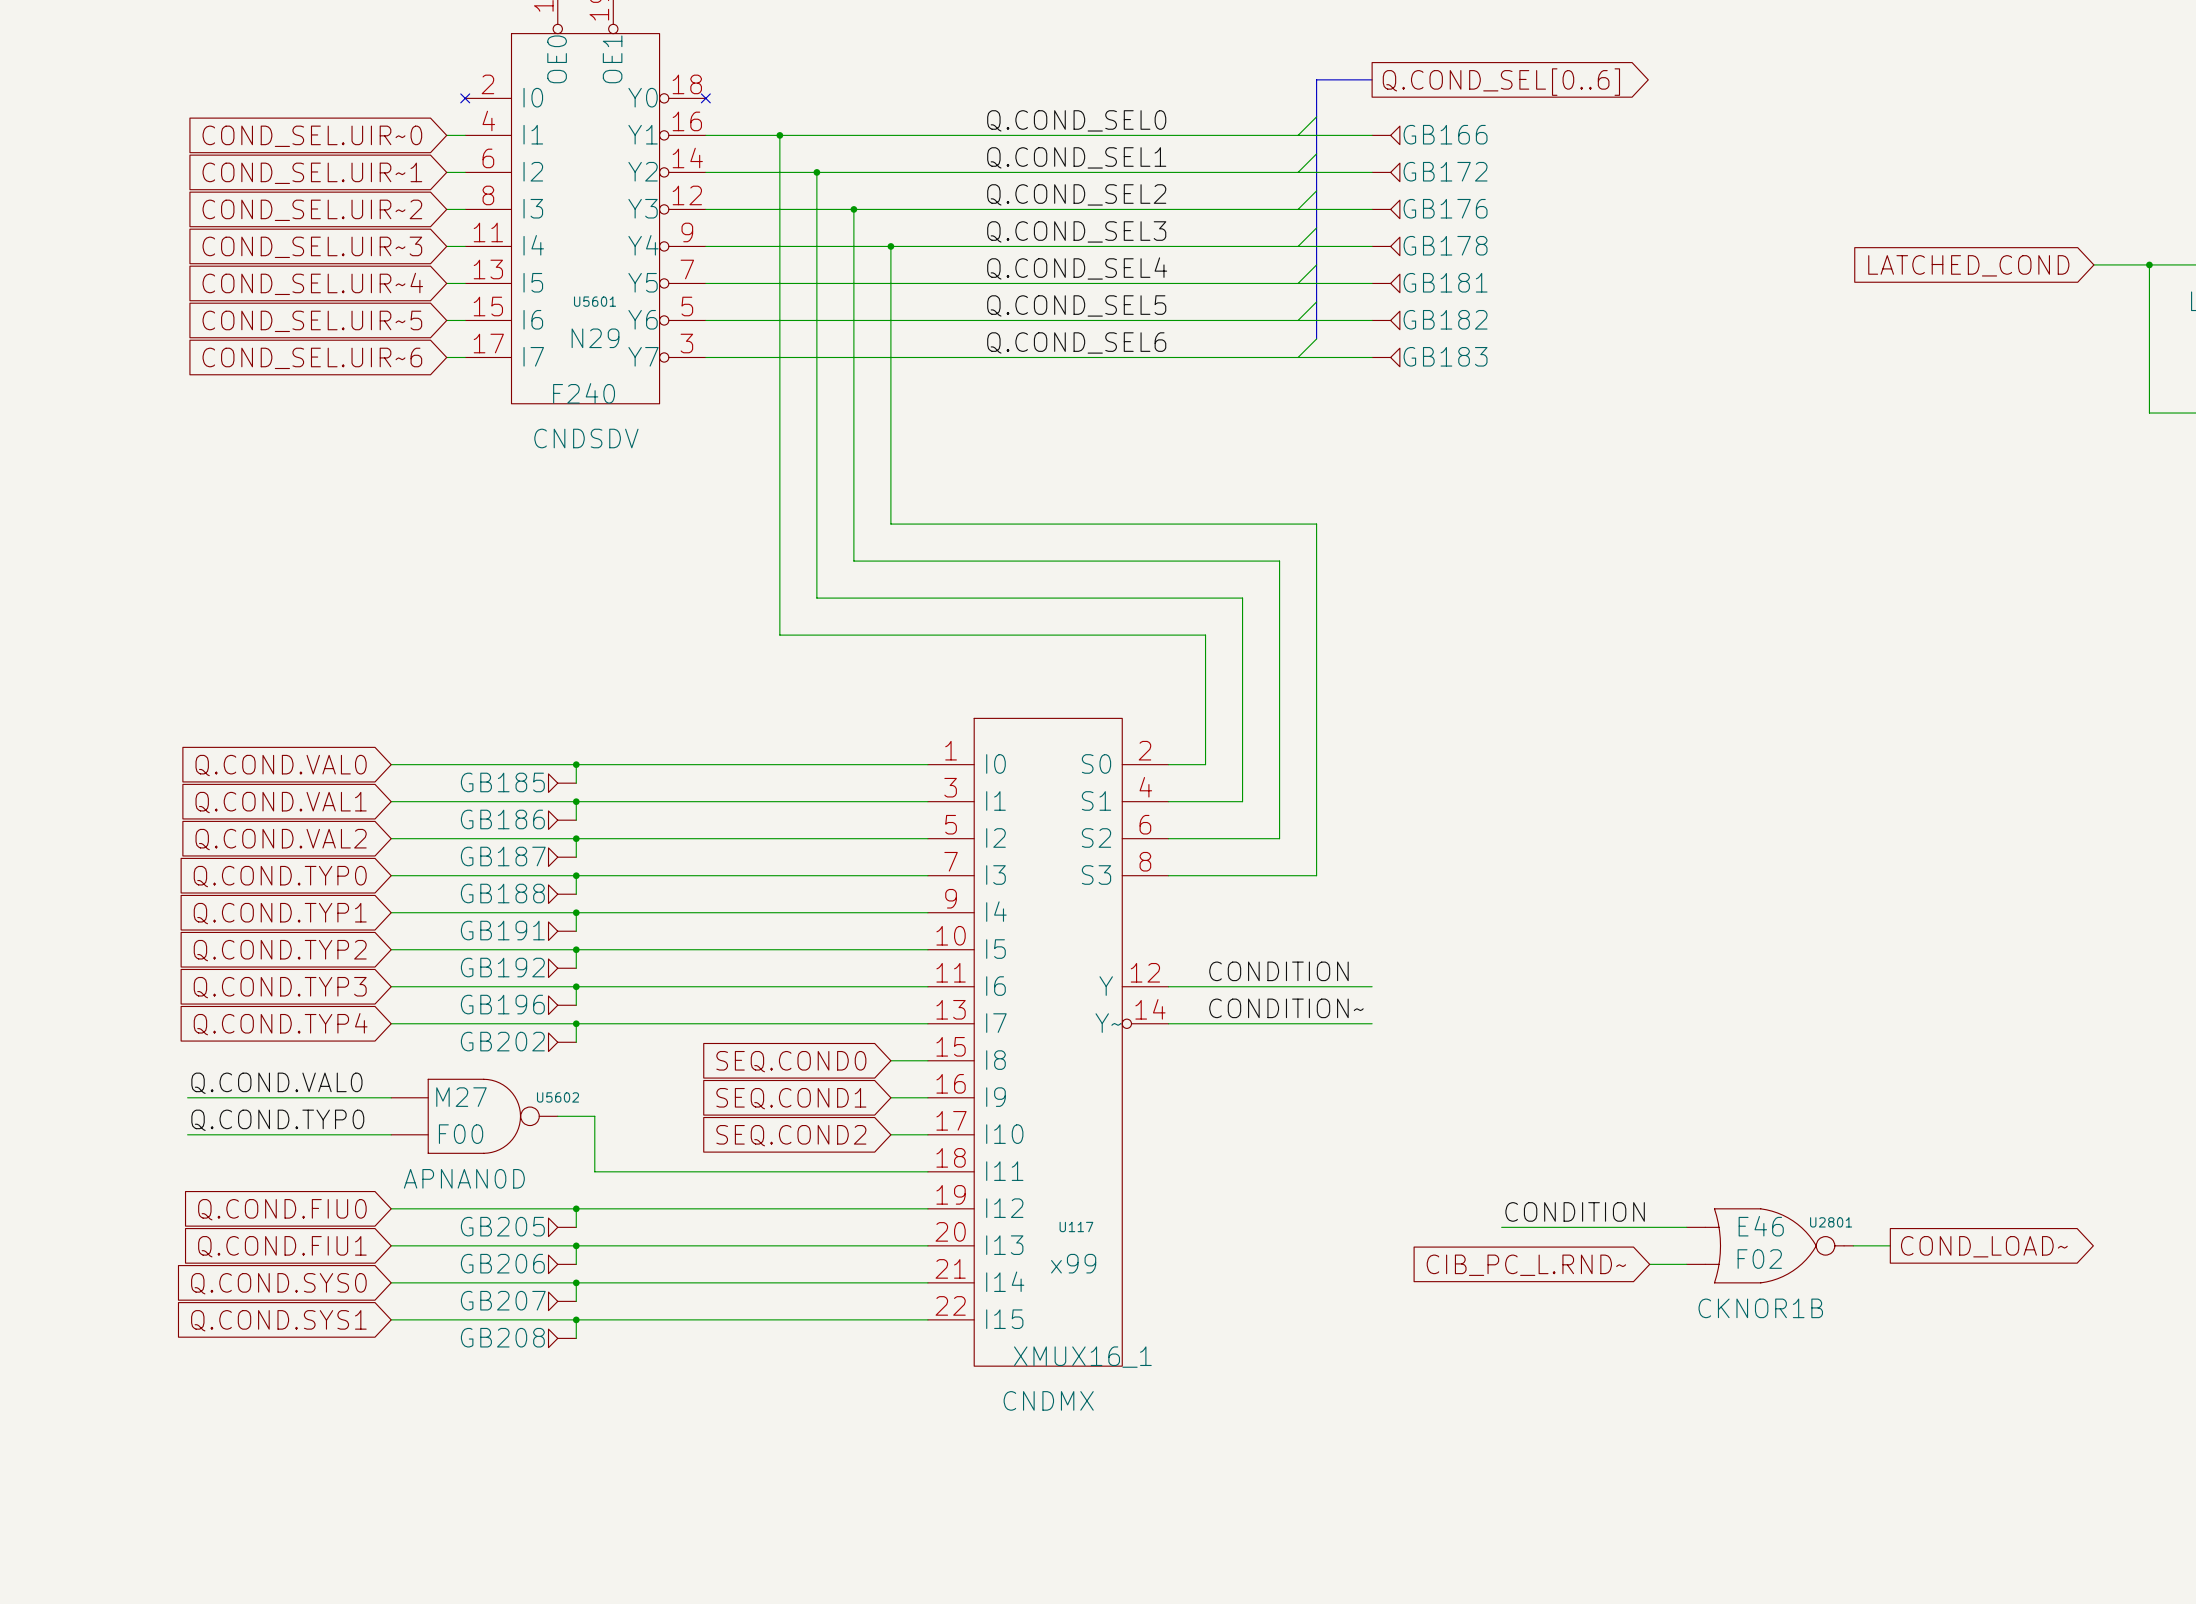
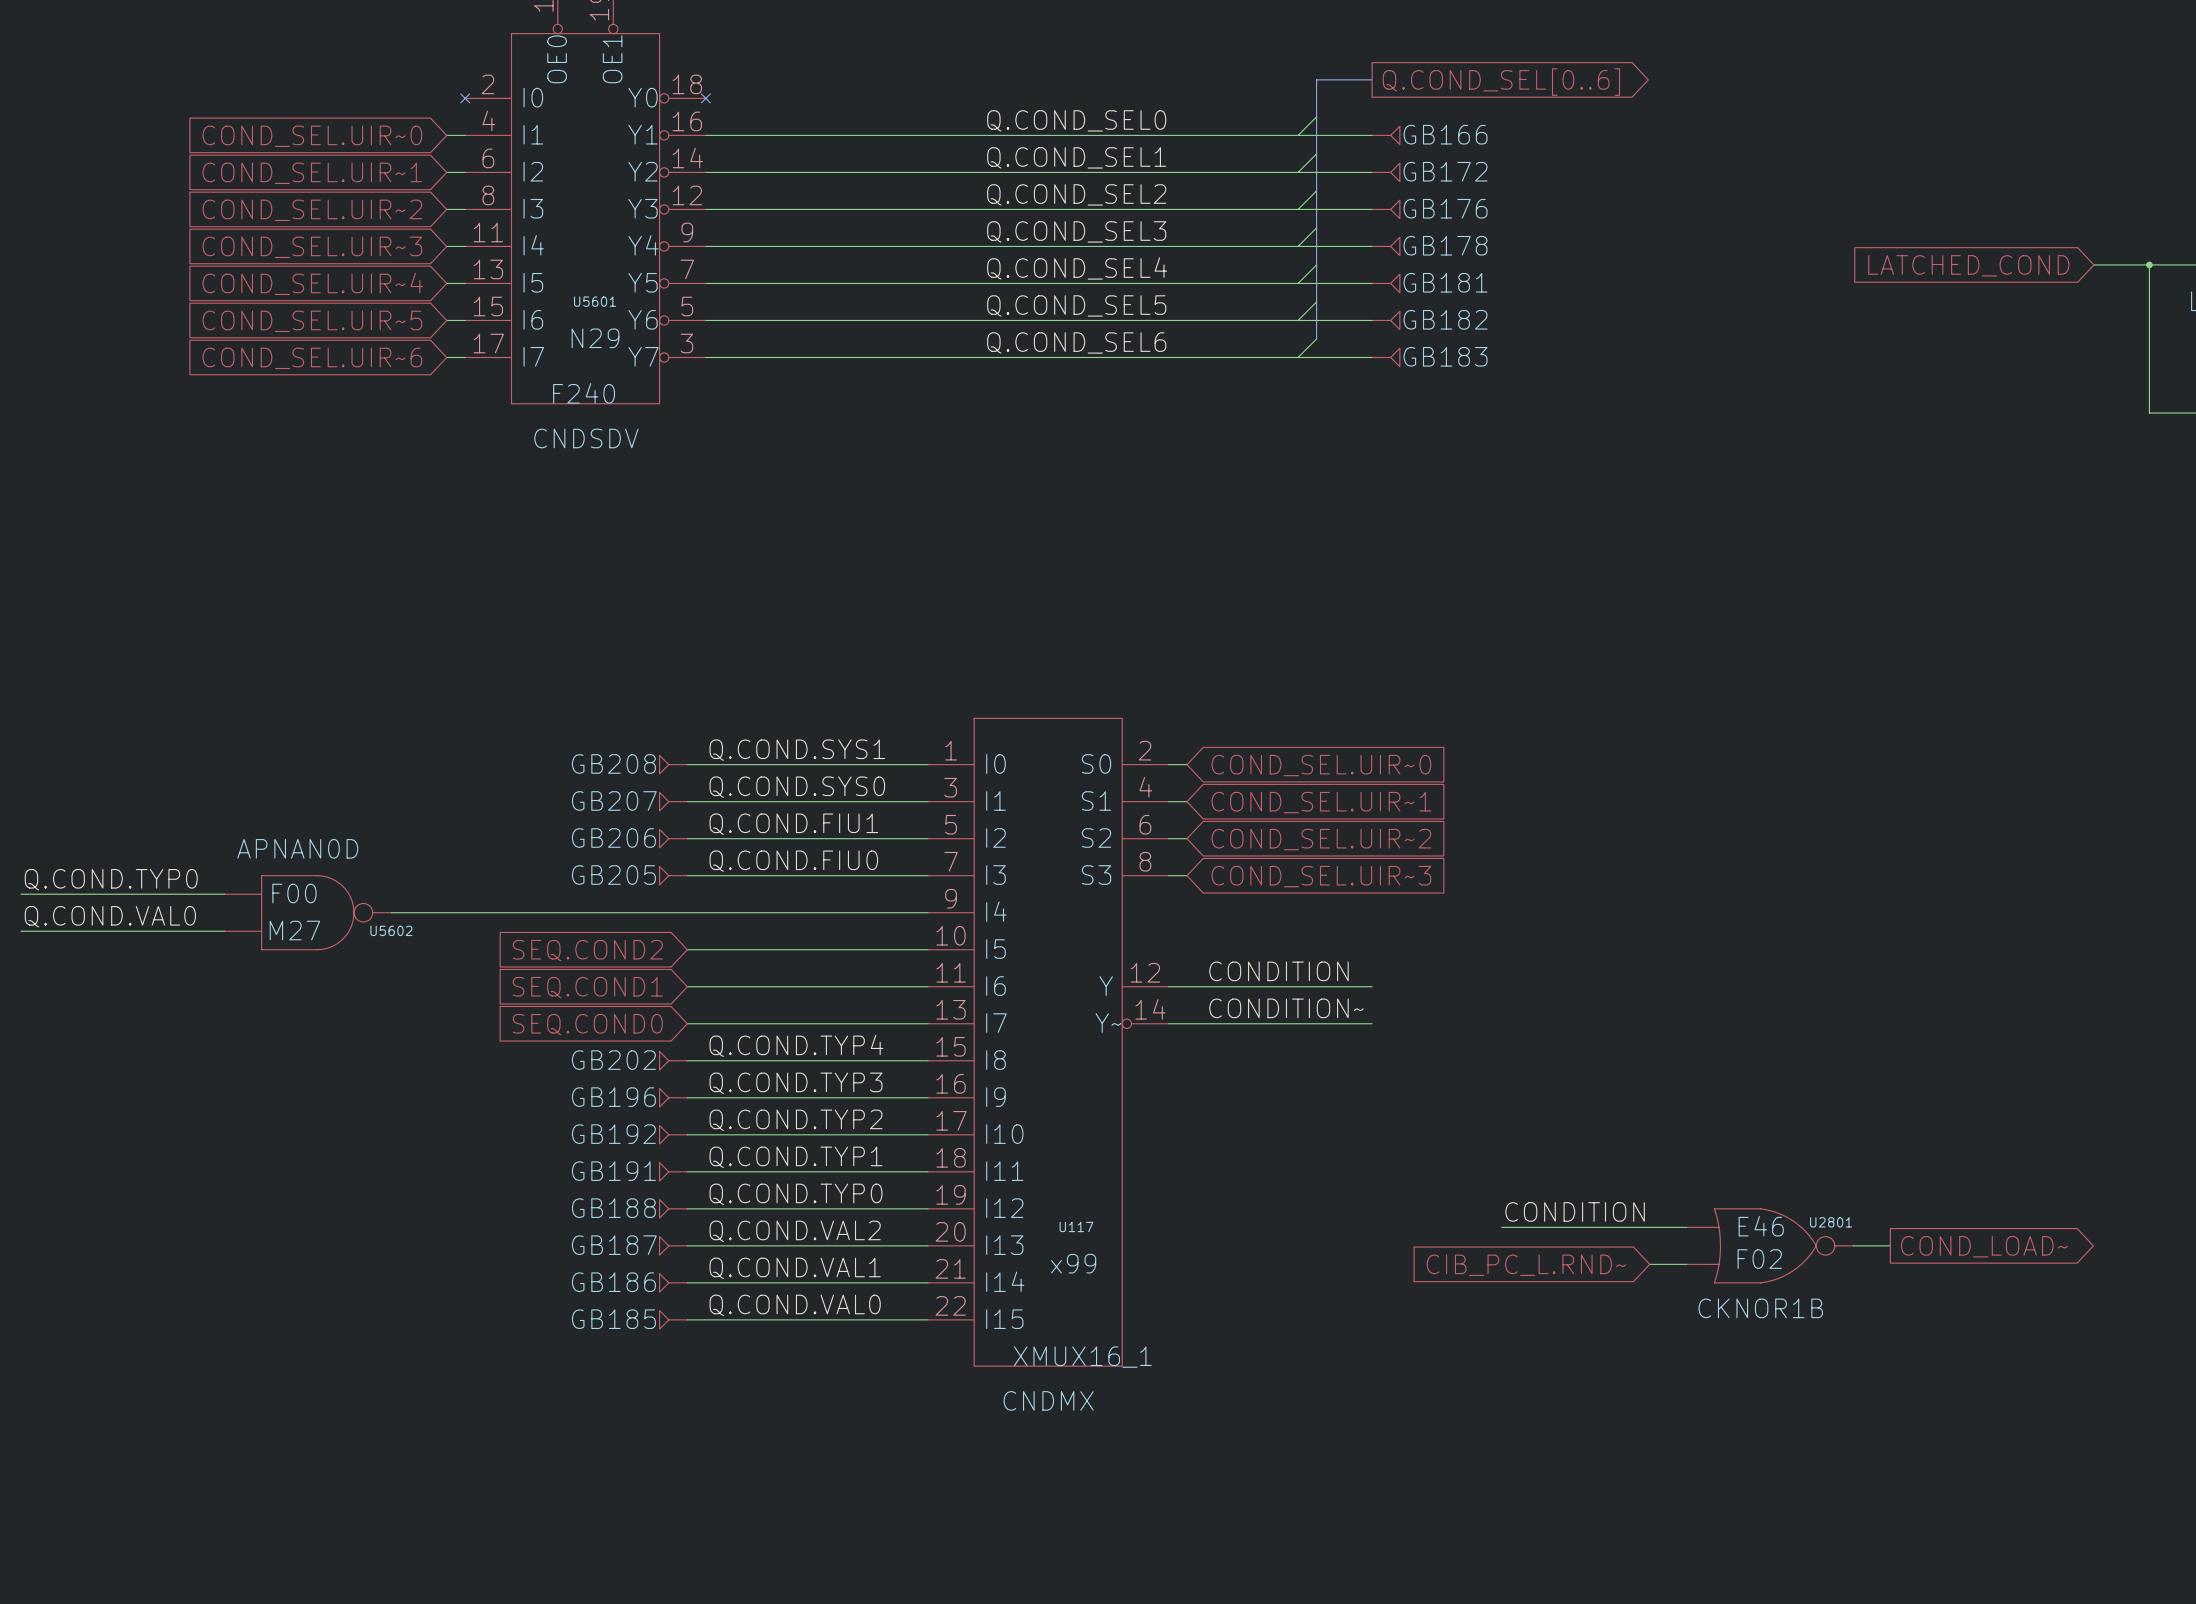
wire: (779, 135) (779, 635) (1205, 635) (1205, 764) (1187, 764) -> none
junction: (779, 135) -> none
wire: (816, 172) (816, 598) (1242, 598) (1242, 801) (1187, 801) -> none
junction: (816, 172) -> none
wire: (853, 209) (853, 561) (1279, 561) (1279, 838) (1187, 838) -> none
junction: (853, 209) -> none
wire: (890, 246) (890, 524) (1316, 524) (1316, 875) (1187, 875) -> none
junction: (890, 246) -> none
label: none -> Q.COND.SYS1 (797, 750)
wire: (391, 764) (687, 764) -> none
wire: (576, 764) (576, 783) -> none
junction: (576, 764) -> none
global label: Q.COND.VAL0 (281, 765) -> none
global label: none -> COND_SEL.UIR~0 (1321, 765)
GB185 position: (562, 783) -> (673, 1319)
label: none -> Q.COND.SYS0 (797, 787)
wire: (391, 801) (687, 801) -> none
wire: (576, 801) (576, 820) -> none
junction: (576, 801) -> none
global label: Q.COND.VAL1 (281, 802) -> none
global label: none -> COND_SEL.UIR~1 (1321, 802)
GB186 position: (562, 820) -> (673, 1282)
label: none -> Q.COND.FIU1 (793, 824)
wire: (391, 838) (687, 838) -> none
wire: (576, 838) (576, 857) -> none
junction: (576, 838) -> none
global label: Q.COND.VAL2 (281, 839) -> none
global label: none -> COND_SEL.UIR~2 (1321, 839)
GB187 position: (562, 857) -> (673, 1245)
label: none -> Q.COND.FIU0 (793, 861)
wire: (391, 875) (687, 875) -> none
wire: (576, 875) (576, 894) -> none
junction: (576, 875) -> none
global label: Q.COND.TYP0 (280, 876) -> none
global label: none -> COND_SEL.UIR~3 (1321, 876)
label: none -> Q.COND.TYP0 (111, 879)
wire: none -> (21, 894) (224, 894)
GB188 position: (562, 894) -> (673, 1208)
wire: (576, 912) (576, 931) -> none
junction: (576, 912) -> none
global label: Q.COND.TYP1 (280, 913) -> none
label: none -> Q.COND.VAL0 (110, 916)
wire: none -> (21, 931) (224, 931)
GB191 position: (562, 931) -> (673, 1171)
wire: (391, 949) (687, 949) -> none
wire: (576, 949) (576, 968) -> none
junction: (576, 949) -> none
global label: Q.COND.TYP2 (280, 950) -> none
global label: none -> SEQ.COND2 (587, 950)
GB192 position: (562, 968) -> (673, 1134)
wire: (391, 986) (687, 986) -> none
wire: (576, 986) (576, 1005) -> none
junction: (576, 986) -> none
global label: Q.COND.TYP3 (280, 987) -> none
global label: none -> SEQ.COND1 (587, 987)
GB196 position: (562, 1005) -> (673, 1097)
wire: (391, 1023) (687, 1023) -> none
wire: (576, 1023) (576, 1042) -> none
junction: (576, 1023) -> none
global label: Q.COND.TYP4 (280, 1024) -> none
global label: none -> SEQ.COND0 (587, 1024)
GB202 position: (562, 1042) -> (673, 1060)
label: none -> Q.COND.TYP4 (796, 1045)
wire: none -> (687, 1060) (890, 1060)
global label: SEQ.COND0 (791, 1061) -> none
label: Q.COND.VAL0 (276, 1083) -> none
label: none -> Q.COND.TYP3 (796, 1083)
wire: (187, 1097) (391, 1097) -> none
U5602 text position: M27 (461, 1097) -> M27 (294, 930)
U5602 name position: U5602 (557, 1097) -> U5602 (391, 930)
wire: none -> (687, 1097) (890, 1097)
global label: SEQ.COND1 (791, 1098) -> none
U5602 position: (474, 1116) -> (307, 912)
wire: (557, 1116) (594, 1116) (594, 1171) (687, 1171) -> none
label: Q.COND.TYP0 (277, 1120) -> none
label: none -> Q.COND.TYP2 (796, 1120)
wire: (187, 1134) (391, 1134) -> none
U5602 value position: F00 (461, 1134) -> F00 (294, 893)
wire: none -> (687, 1134) (890, 1134)
global label: SEQ.COND2 (791, 1135) -> none
label: none -> Q.COND.TYP1 (796, 1157)
U5602 text position: APNAN0D (464, 1178) -> APNAN0D (297, 848)
label: none -> Q.COND.TYP0 (796, 1194)
wire: (391, 1208) (687, 1208) -> none
wire: (576, 1208) (576, 1227) -> none
junction: (576, 1208) -> none
global label: Q.COND.FIU0 (282, 1209) -> none
GB205 position: (562, 1227) -> (673, 875)
label: none -> Q.COND.VAL2 (795, 1231)
wire: (391, 1245) (687, 1245) -> none
wire: (576, 1245) (576, 1264) -> none
junction: (576, 1245) -> none
global label: Q.COND.FIU1 (282, 1246) -> none
GB206 position: (562, 1264) -> (673, 838)
label: none -> Q.COND.VAL1 (795, 1268)
wire: (391, 1282) (687, 1282) -> none
wire: (576, 1282) (576, 1301) -> none
junction: (576, 1282) -> none
global label: Q.COND.SYS0 (278, 1283) -> none
GB207 position: (562, 1301) -> (673, 801)
label: none -> Q.COND.VAL0 (795, 1305)
wire: (391, 1319) (687, 1319) -> none
wire: (576, 1319) (576, 1338) -> none
junction: (576, 1319) -> none
global label: Q.COND.SYS1 (278, 1320) -> none
GB208 position: (562, 1338) -> (673, 764)

